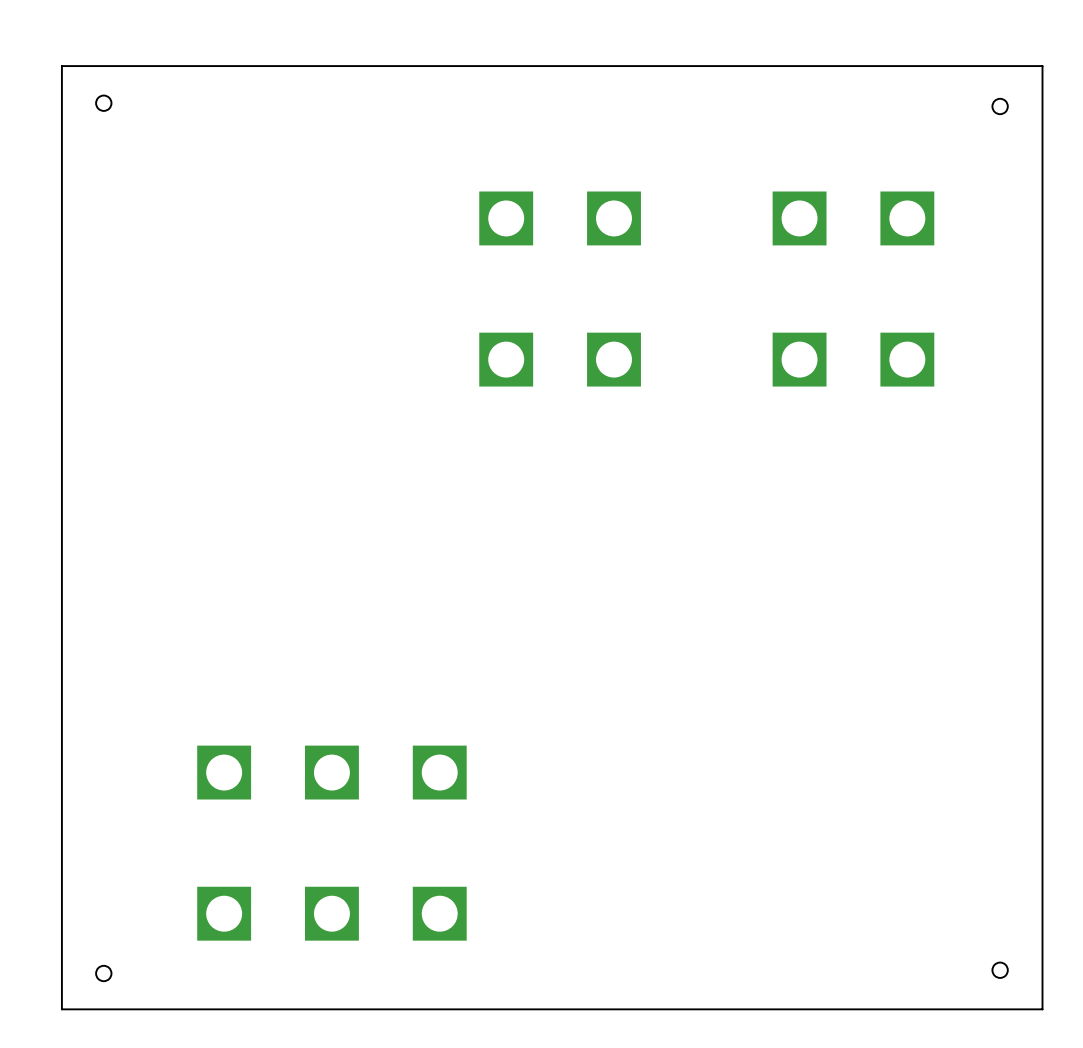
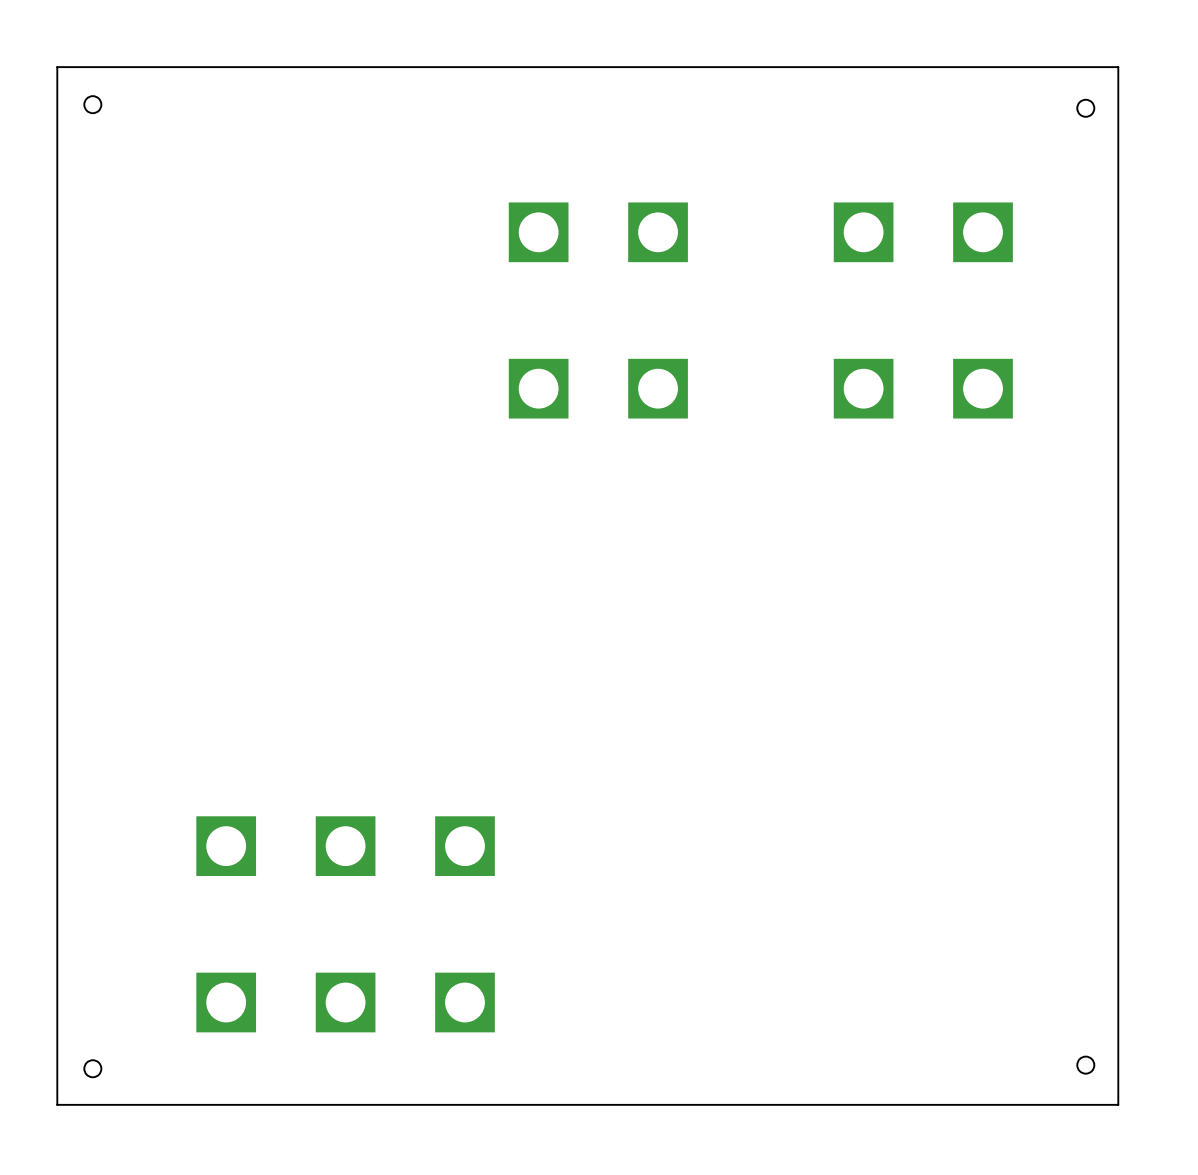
board edge: (1042, 66) (61, 66) (61, 1009) (1042, 1009) (1042, 66) -> (1118, 67) (1118, 1104) (57, 1104) (57, 67) (1118, 67)

